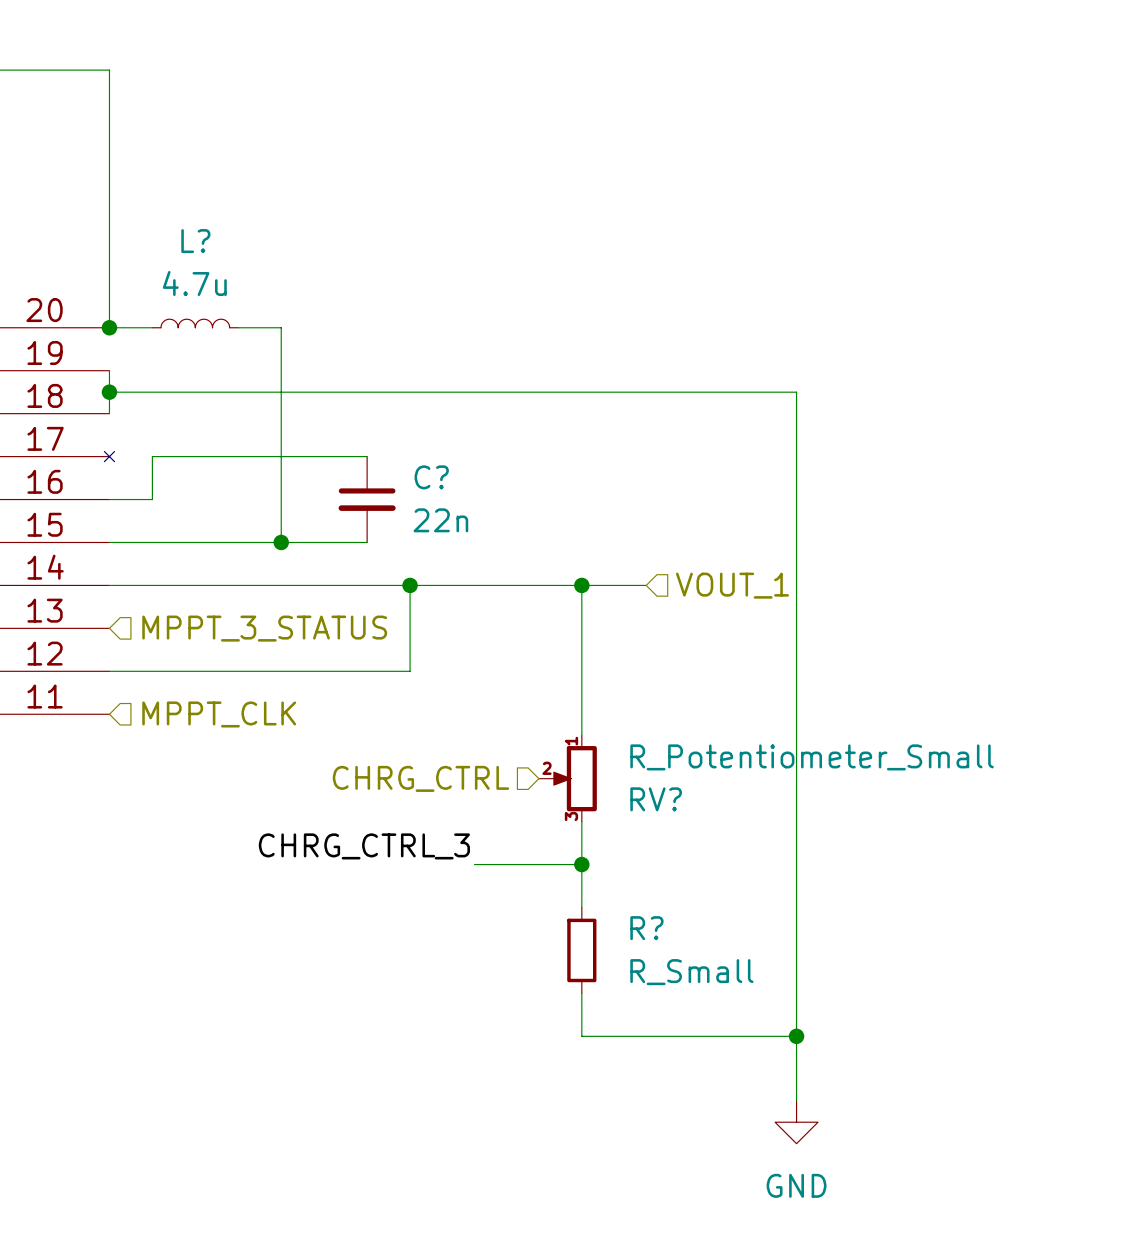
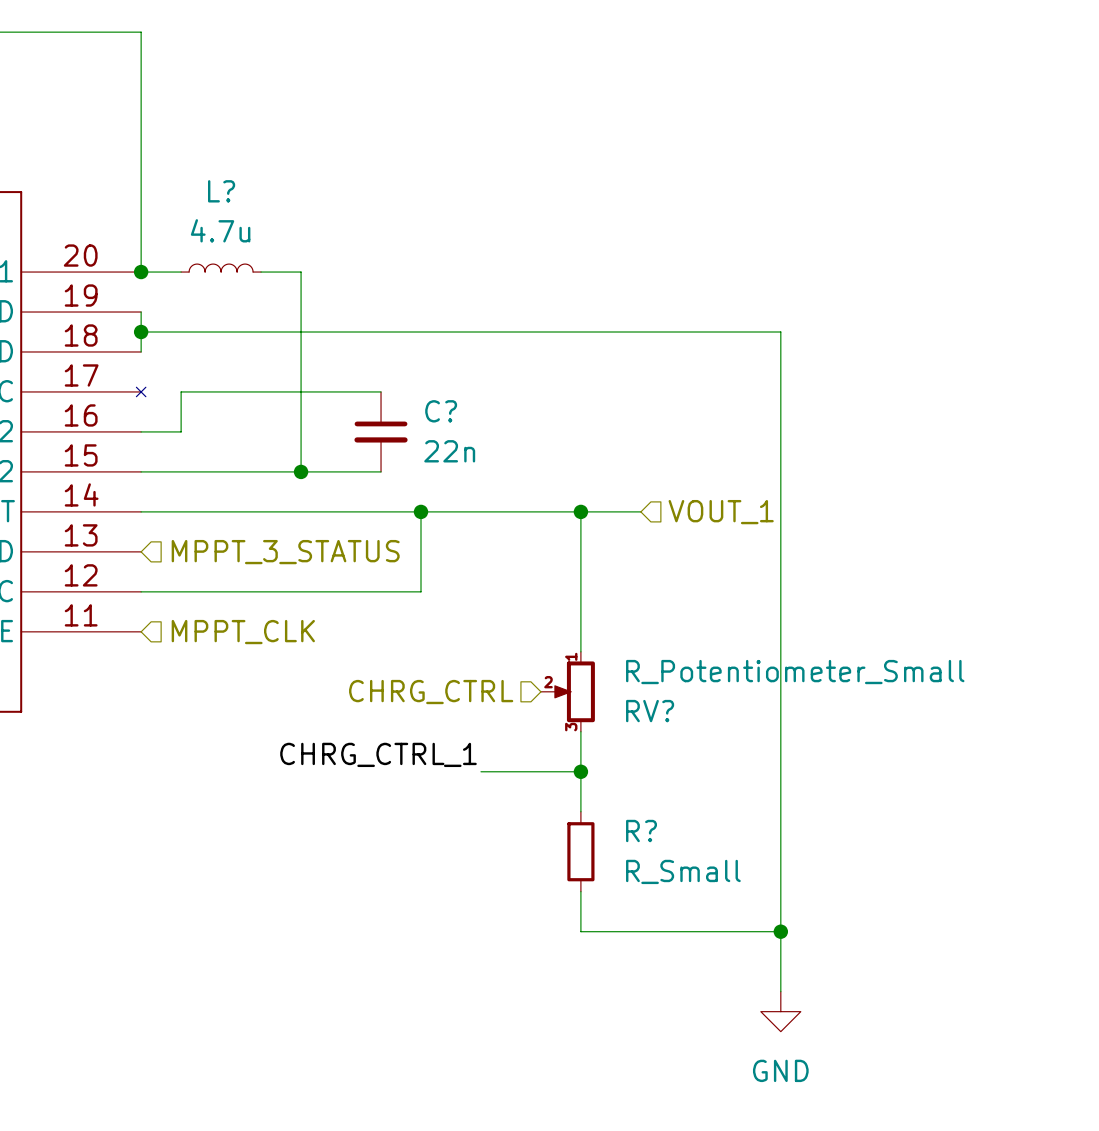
label: CHRG_CTRL_3 (364, 846) -> CHRG_CTRL_1 (378, 754)

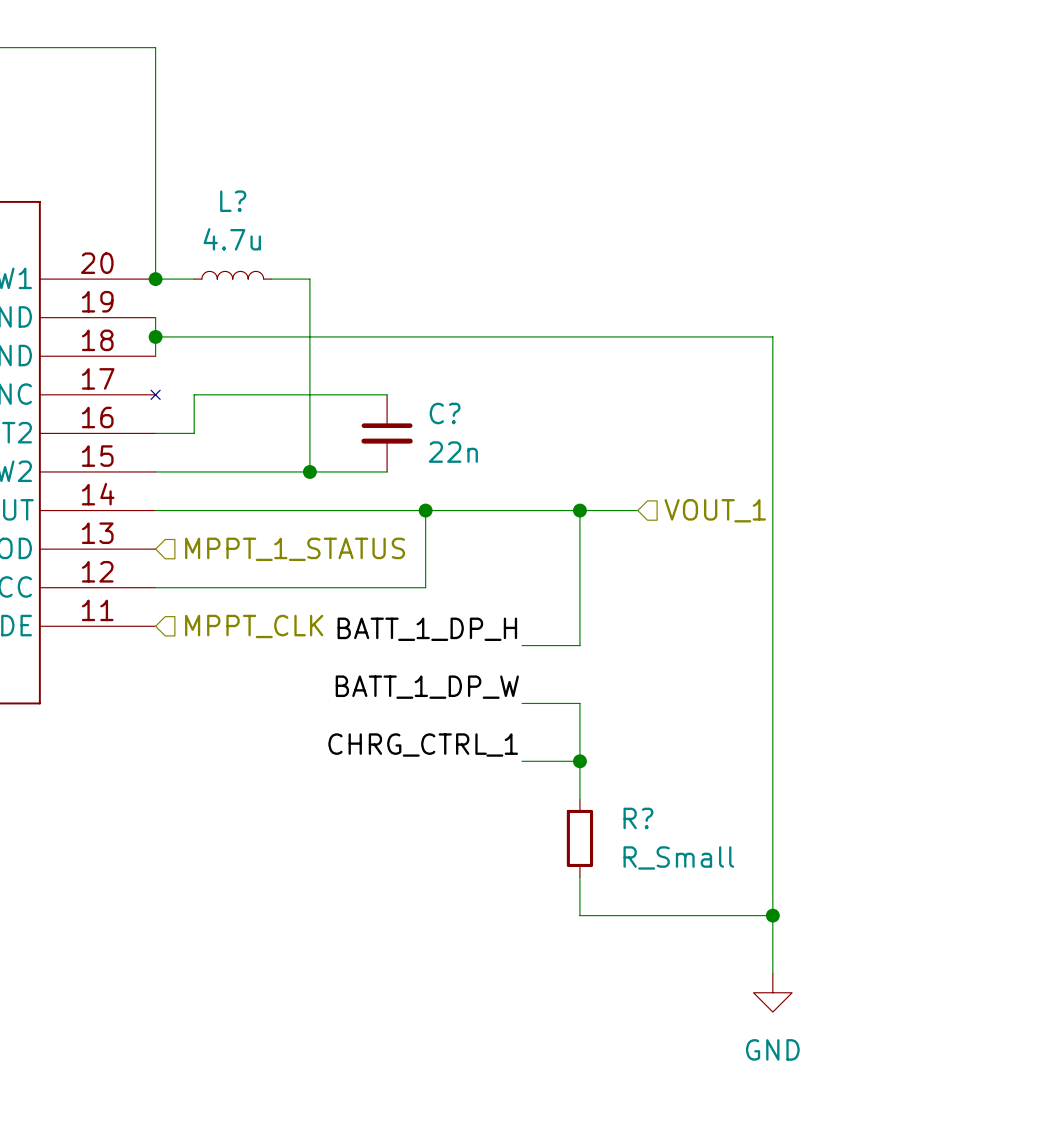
hierarchical label: MPPT_3_STATUS (285, 552) -> MPPT_1_STATUS (295, 549)
label: none -> BATT_1_DP_H (427, 629)
wire: none -> (522, 645) (579, 645)
RV?: R_Potentiometer_Small (567, 691) -> none
hierarchical label: CHRG_CTRL (431, 692) -> none
label: none -> BATT_1_DP_W (427, 687)
wire: none -> (522, 703) (579, 703) (579, 722)
label position: CHRG_CTRL_1 (378, 754) -> CHRG_CTRL_1 (423, 745)
wire: (480, 771) (520, 771) -> none

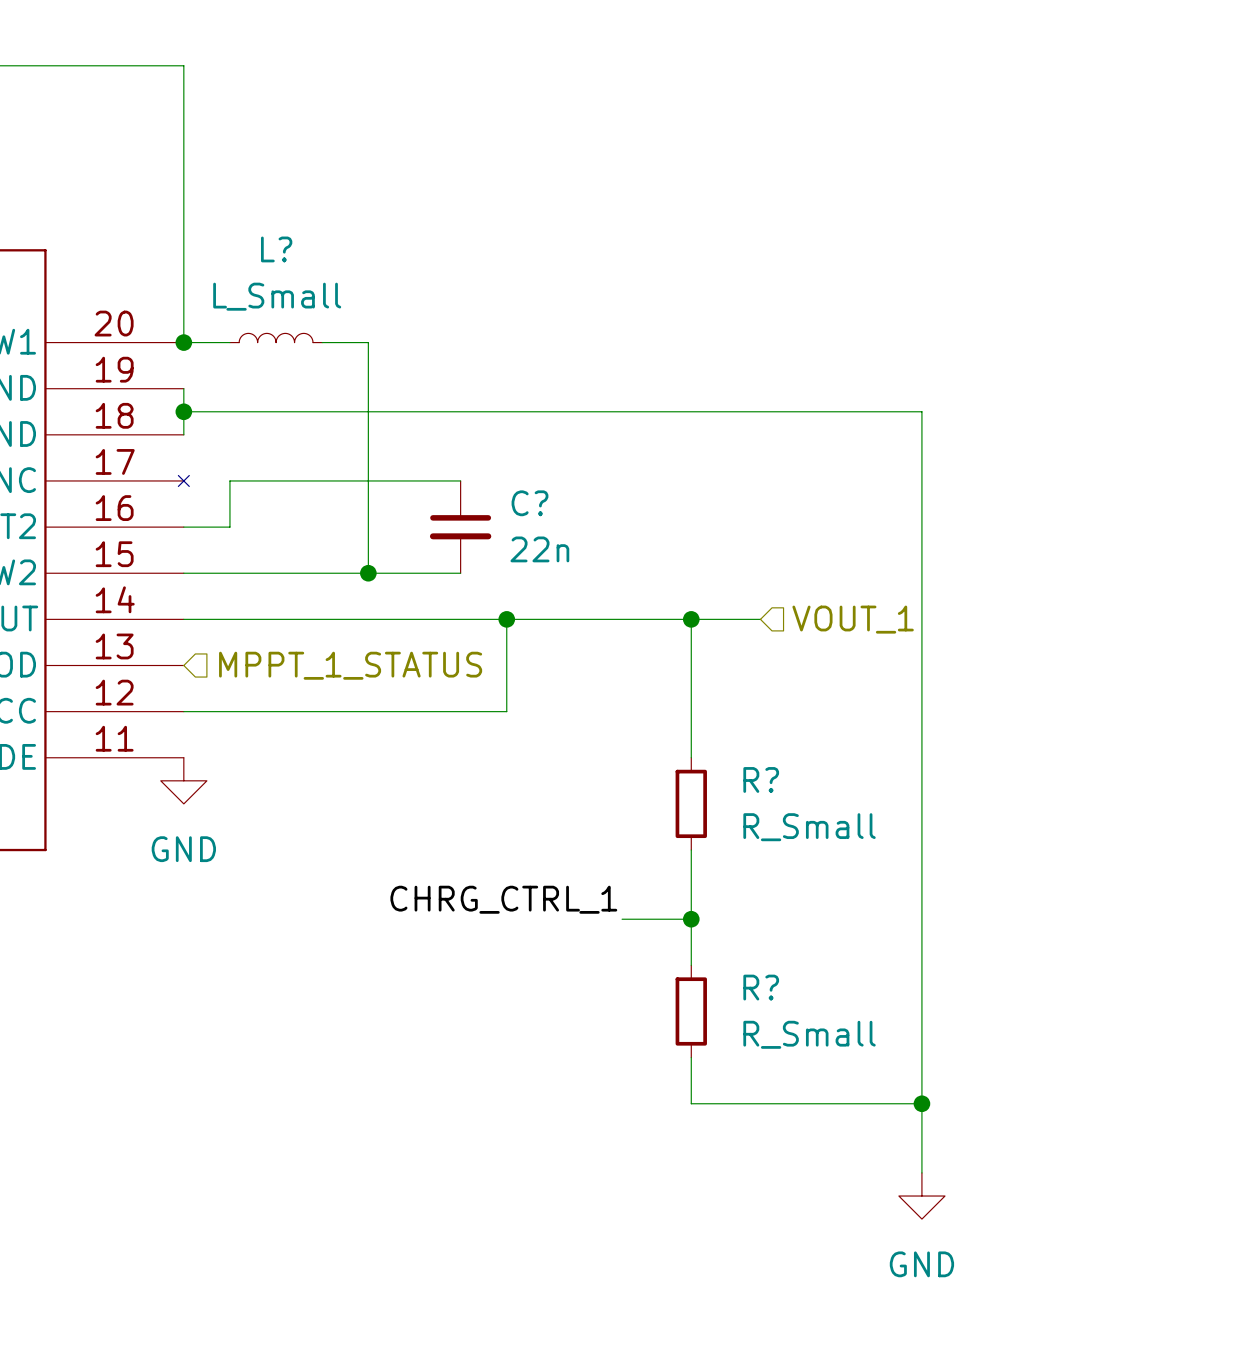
L? value: 4.7u (232, 239) -> L_Small (277, 296)
hierarchical label: MPPT_CLK (254, 626) -> none
wire: (579, 626) (579, 645) (522, 645) -> none
label: BATT_1_DP_H (427, 629) -> none
power symbol: none -> GND (183, 780)
R?: none -> R_Small (691, 803)
label: BATT_1_DP_W (427, 687) -> none
wire: (522, 703) (579, 703) -> none

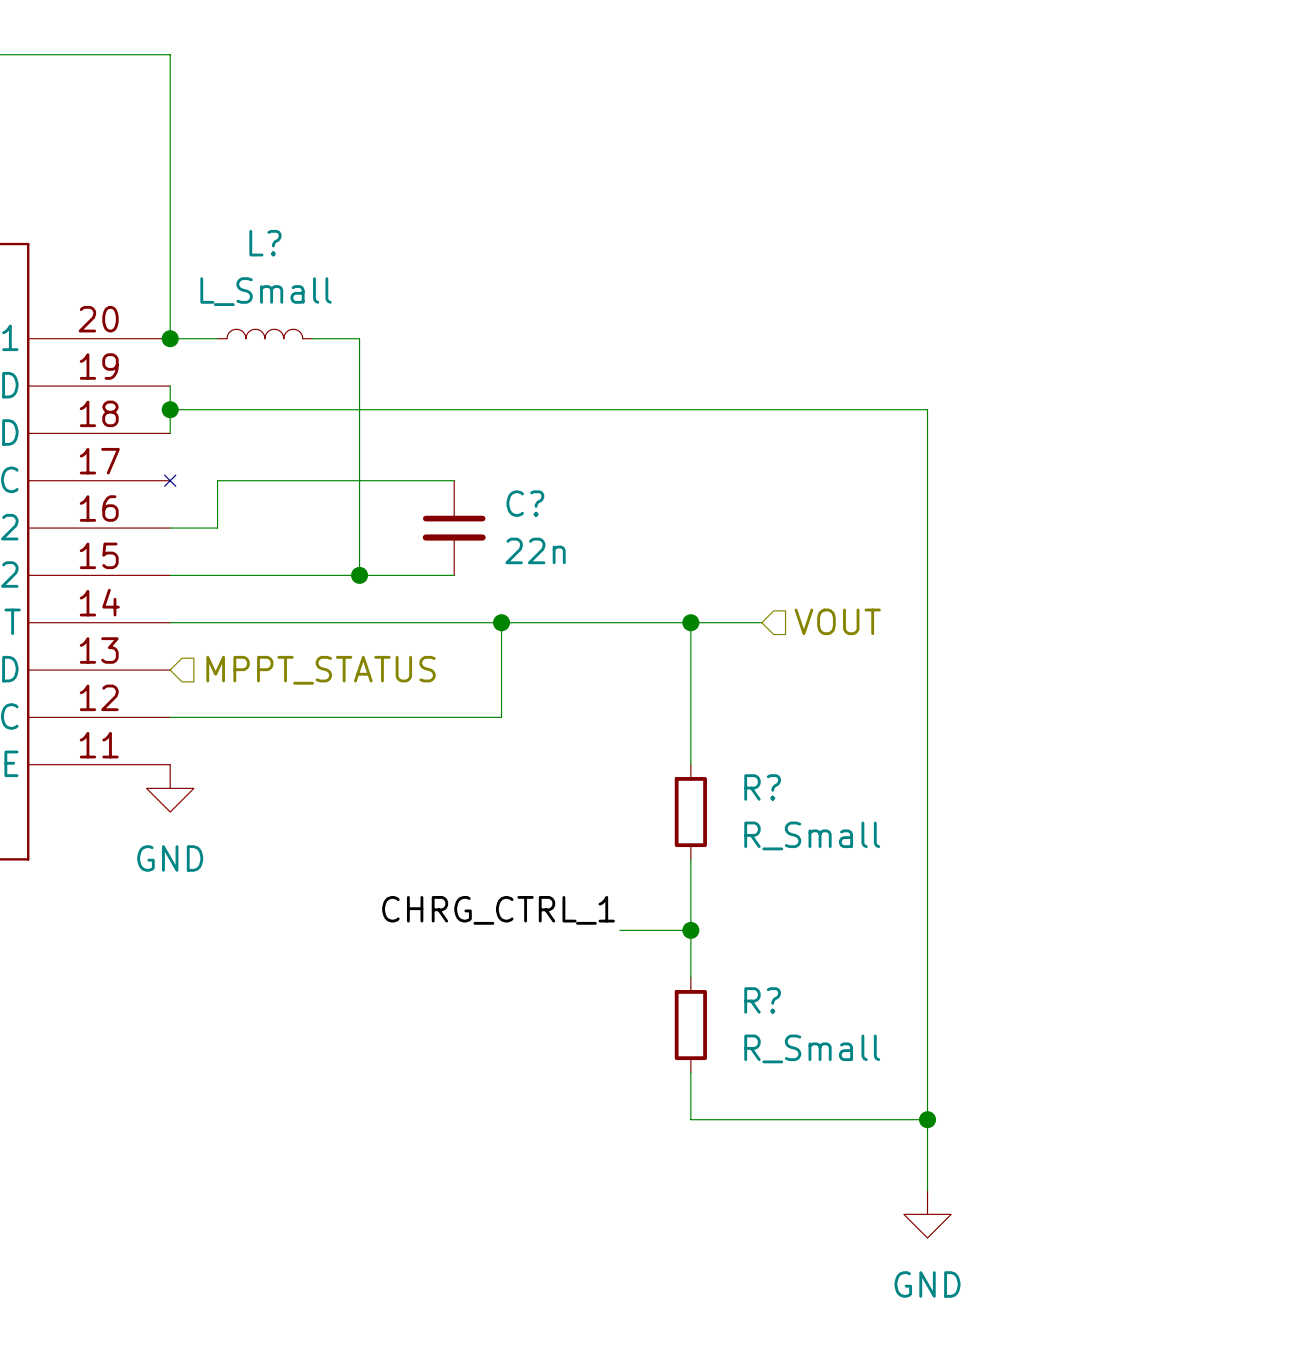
hierarchical label: VOUT_1 (853, 619) -> VOUT (837, 621)
hierarchical label: MPPT_1_STATUS (350, 665) -> MPPT_STATUS (321, 670)

